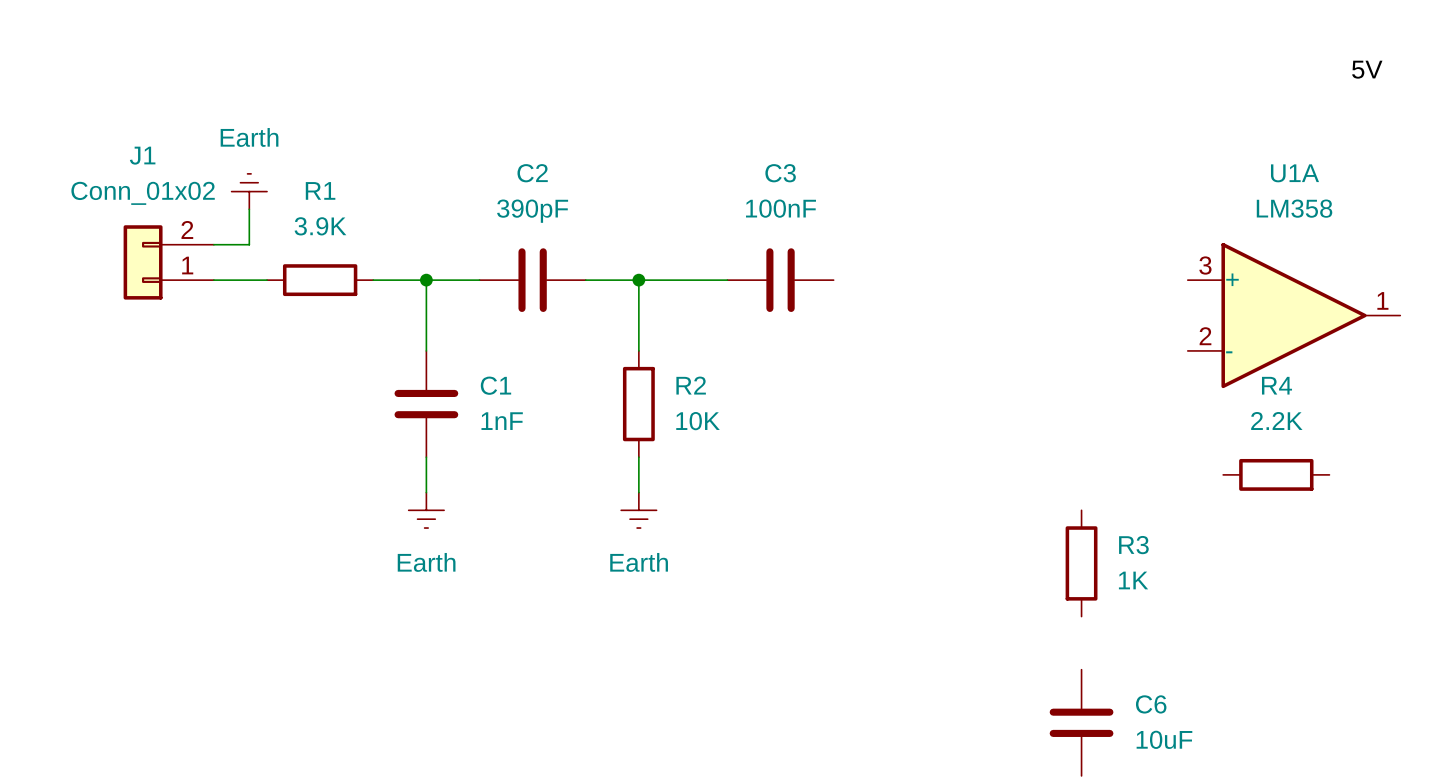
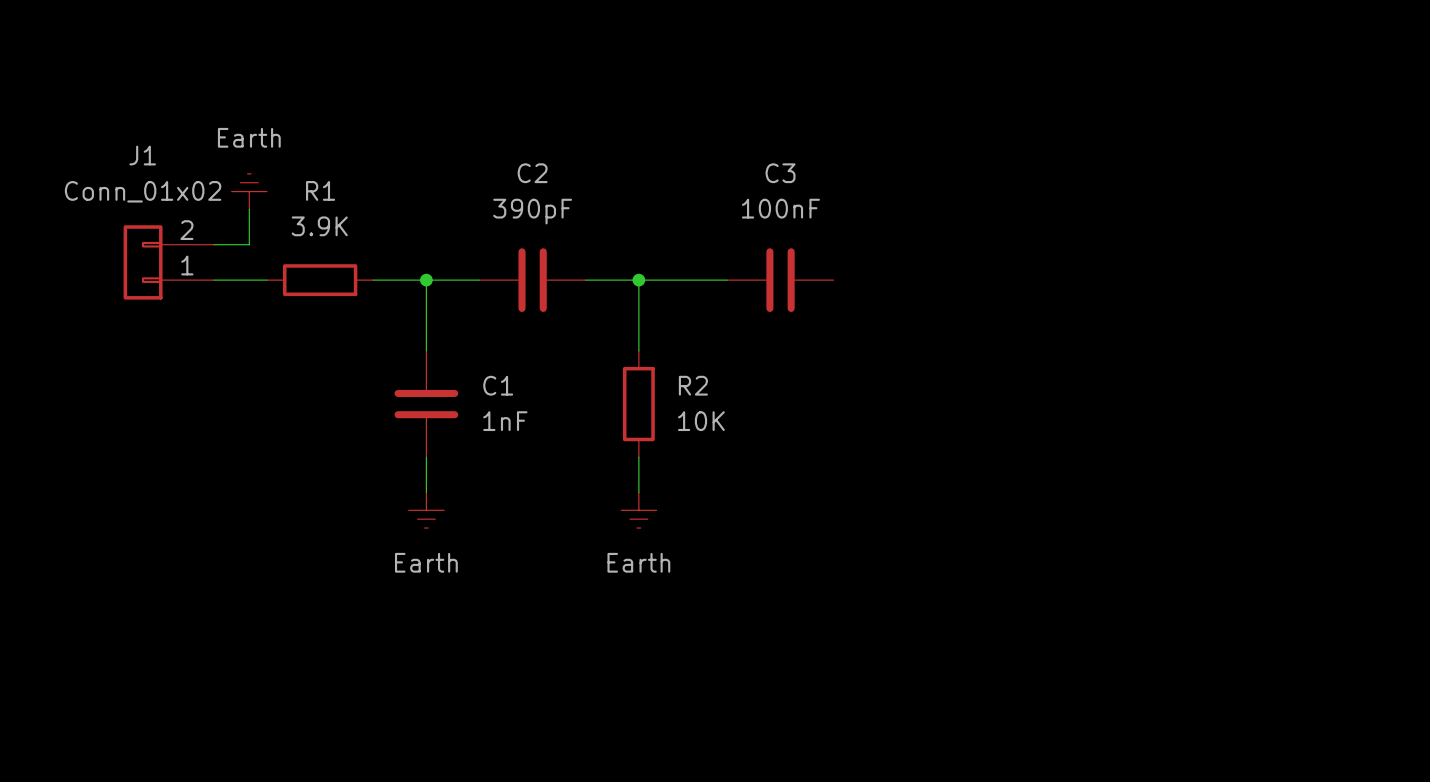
label: 5V (1367, 69) -> none
U1A: LM358 (1294, 315) -> none
R4: 2.2K (1276, 474) -> none
R3: 1K (1081, 563) -> none
C6: 10uF (1081, 722) -> none

